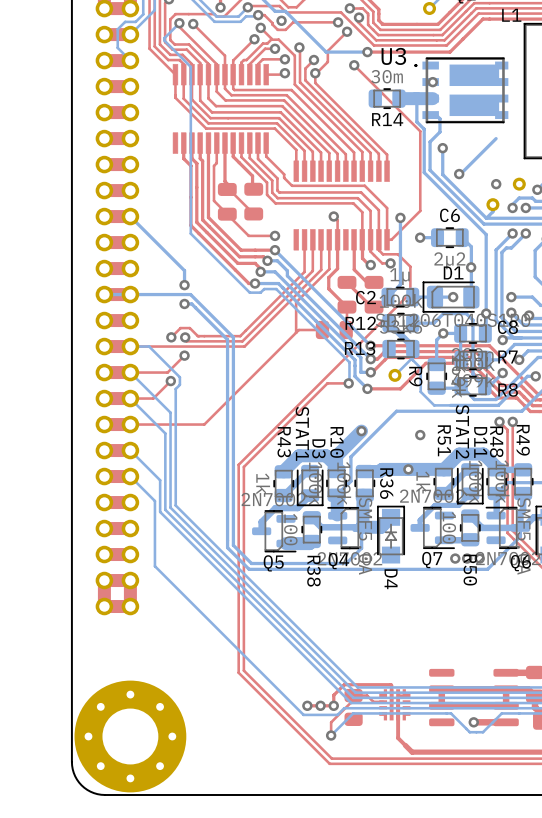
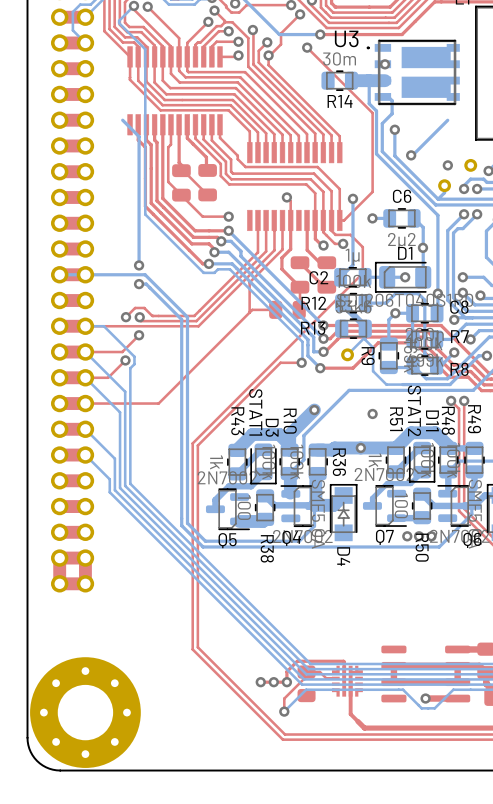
bottom track: (130, 216) (184, 270) -> (122, 120) (139, 136) (139, 251)
bottom track: (154, 514) (154, 566) (303, 714) (337, 714) (344, 708) (349, 708) -> (109, 492) (302, 684)

